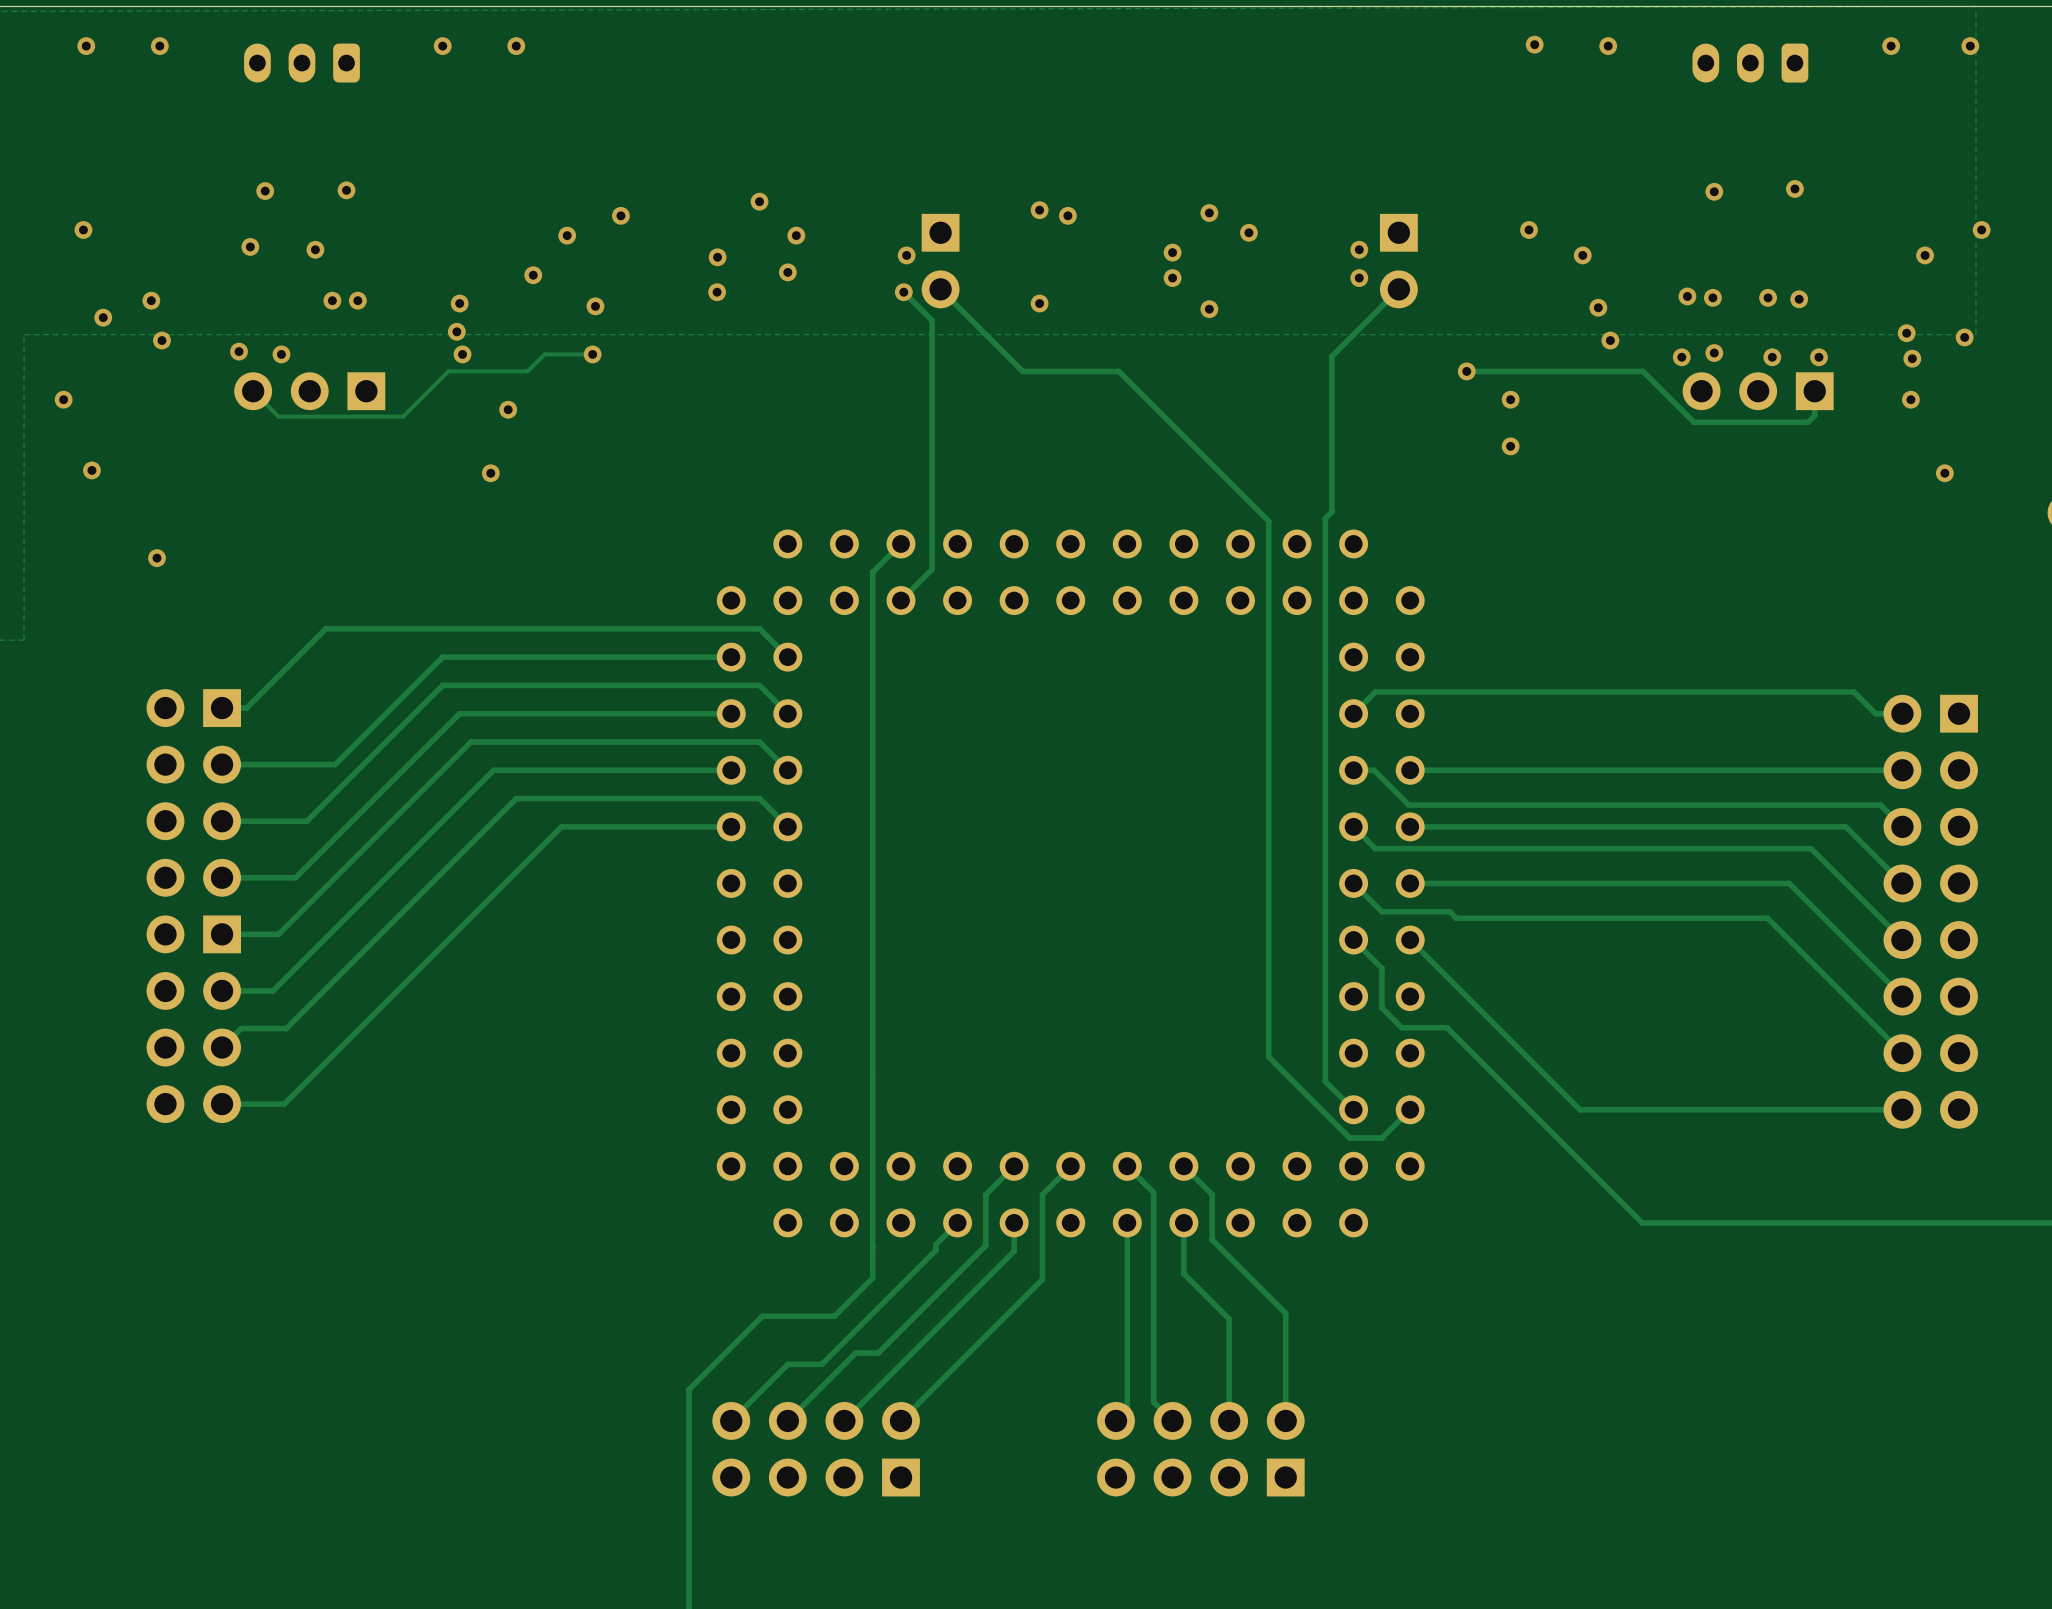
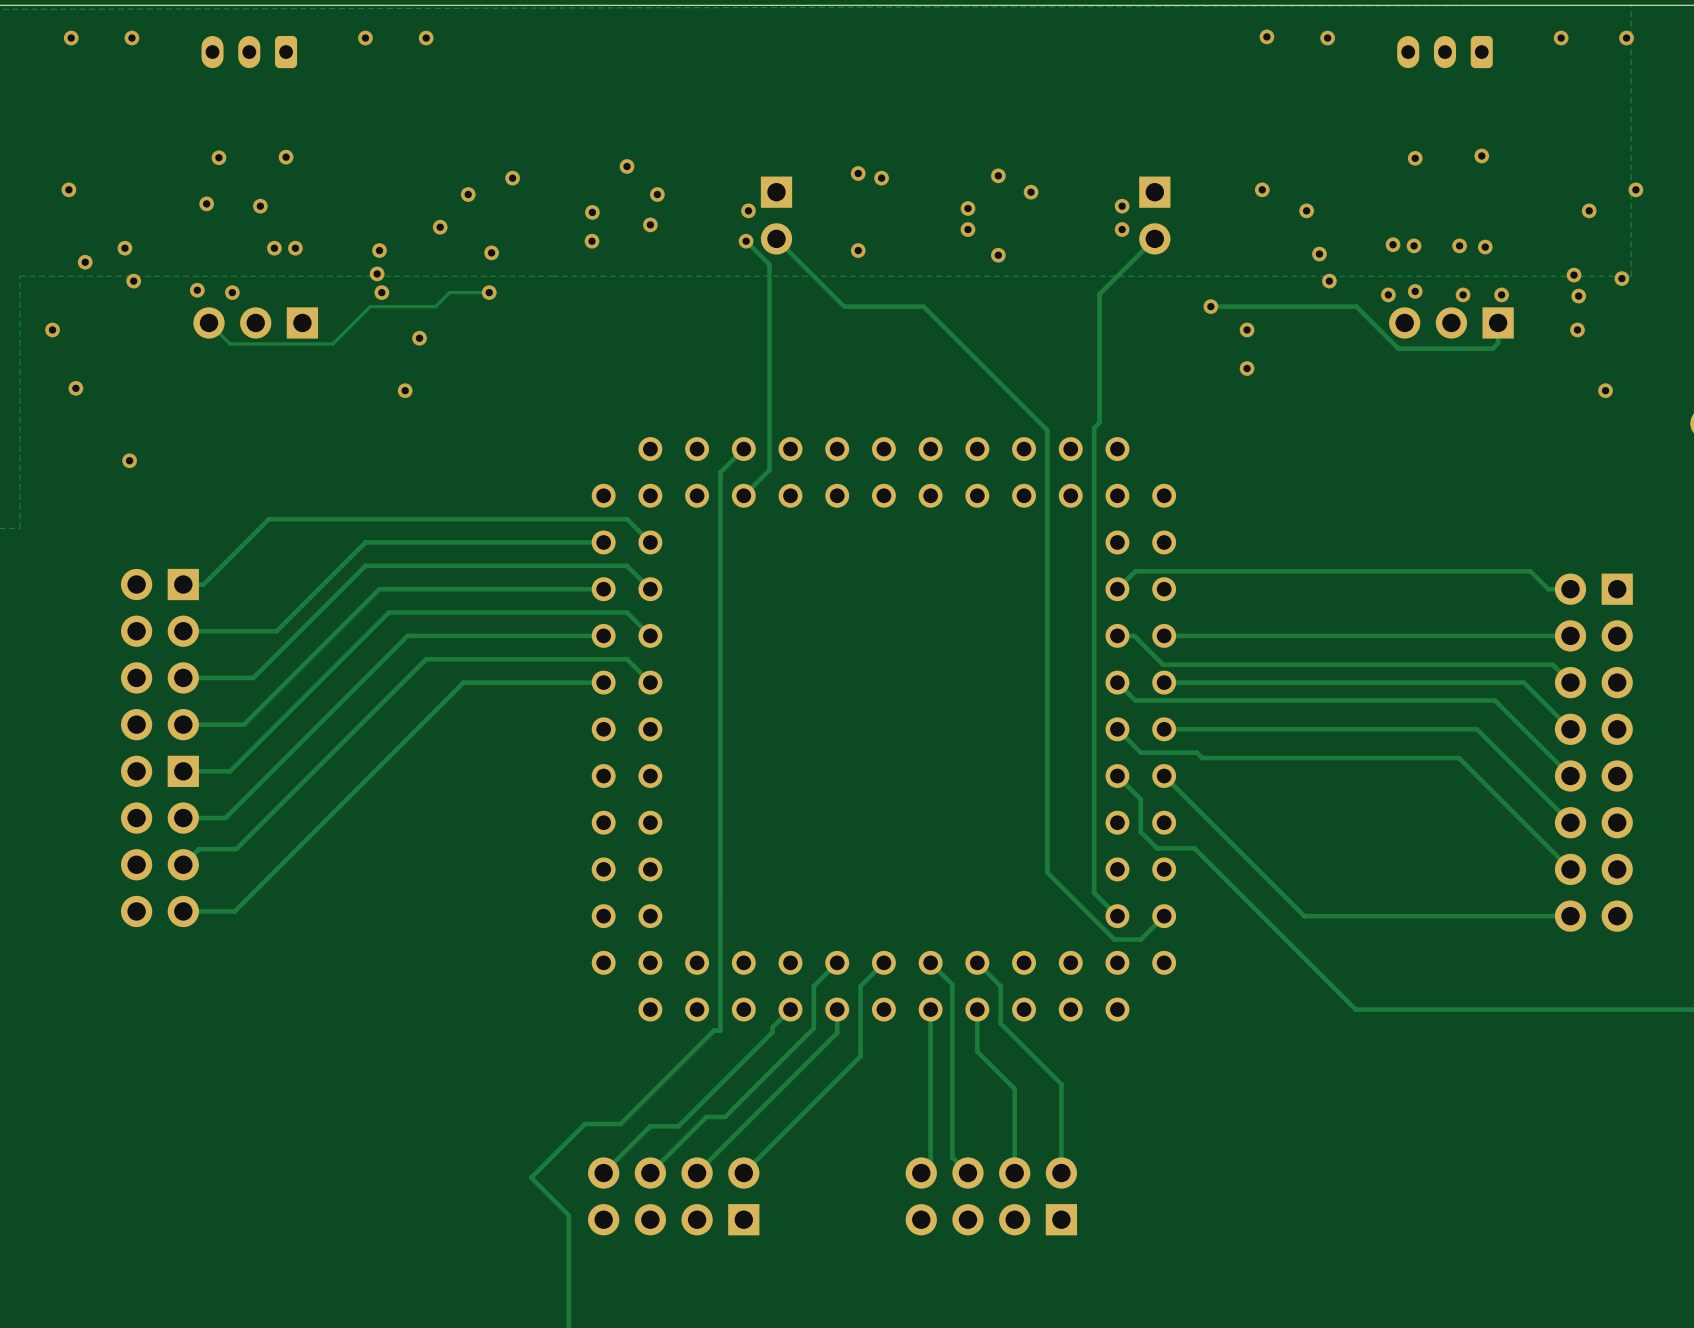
track: (872, 1248) (872, 1278) (834, 1316) (762, 1316) (689, 1389) (689, 1472) -> (720, 1030) (714, 1030) (620, 1123) (584, 1123) (531, 1177) (568, 1215)

